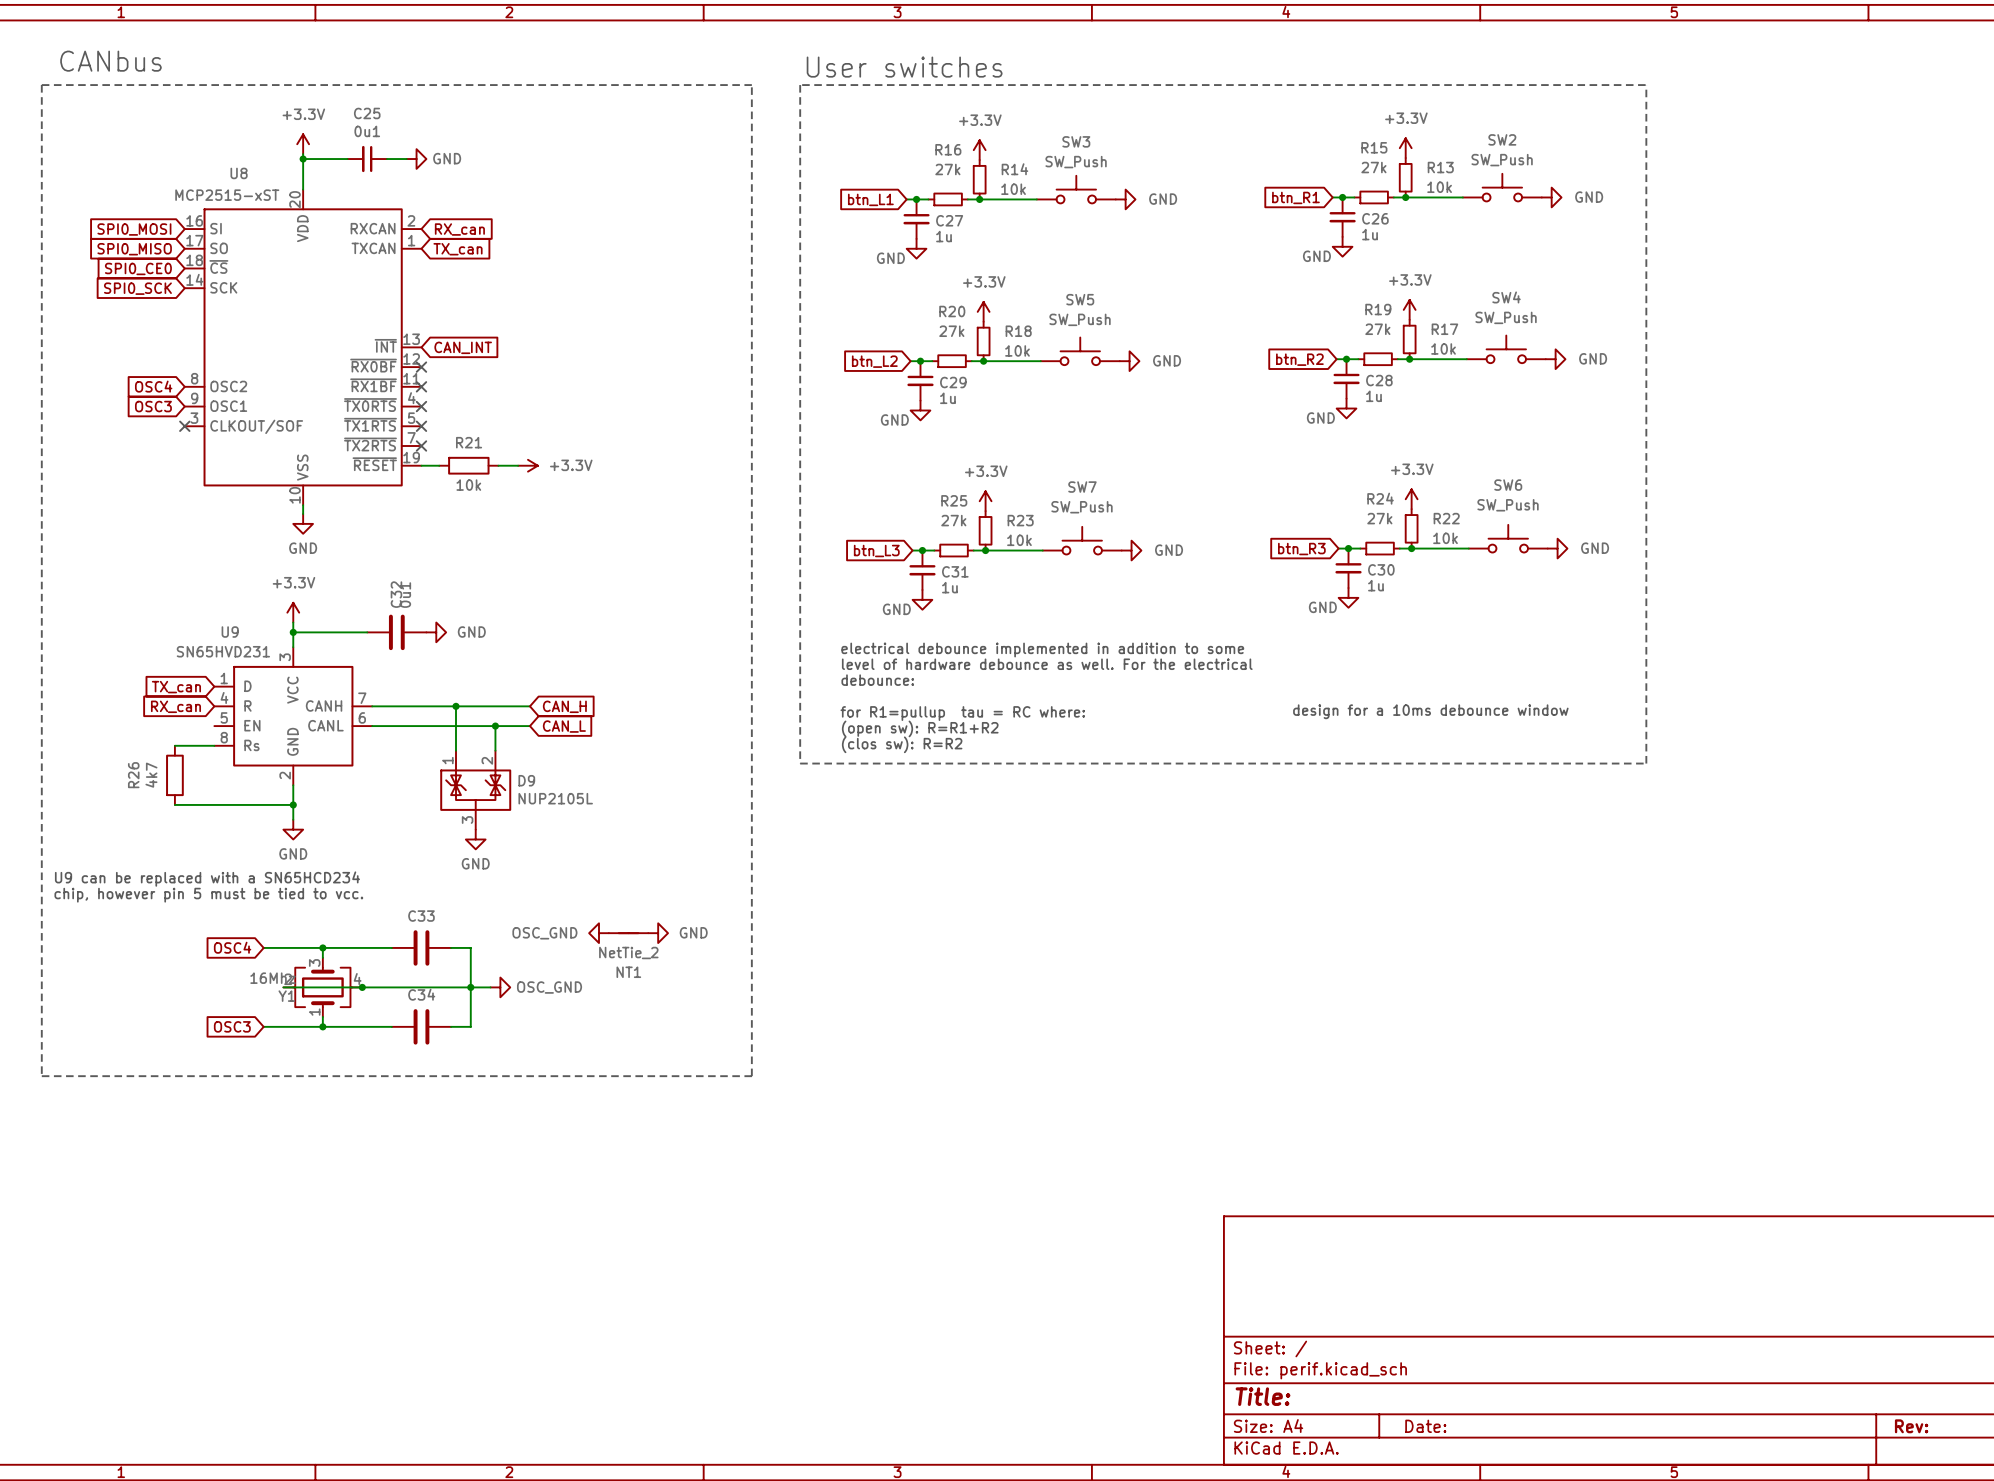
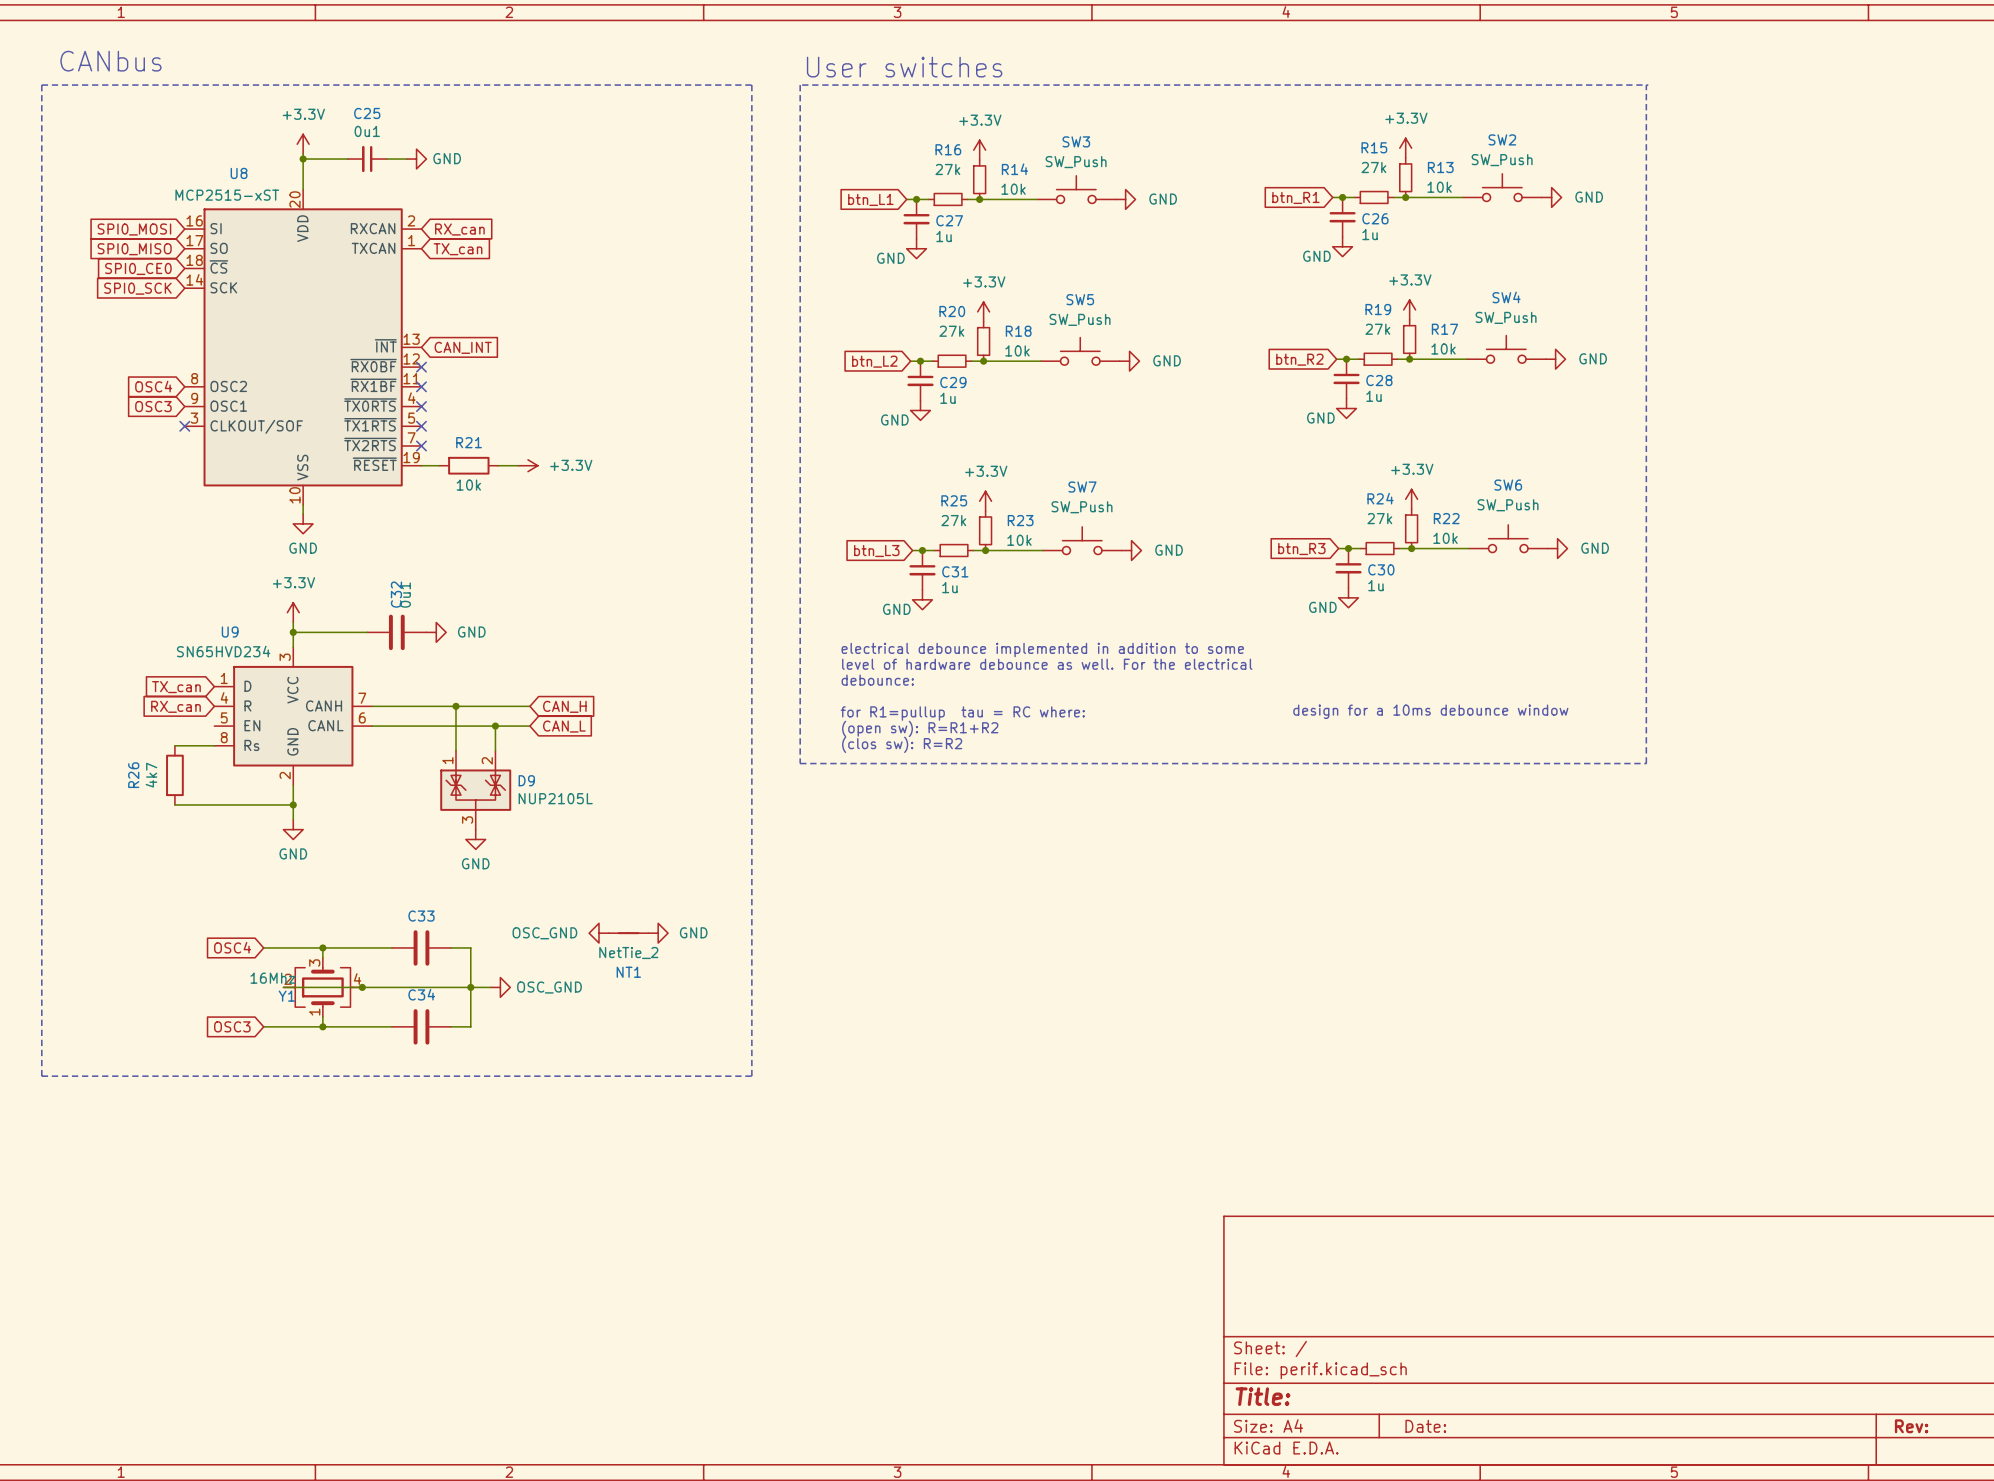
U9 value: SN65HVD231 (223, 651) -> SN65HVD234 (223, 651)
text: U9 can be replaced with a SN65HCD234 (207, 879) -> none
text: chip, however pin 5 must be tied to vcc. (208, 895) -> none

